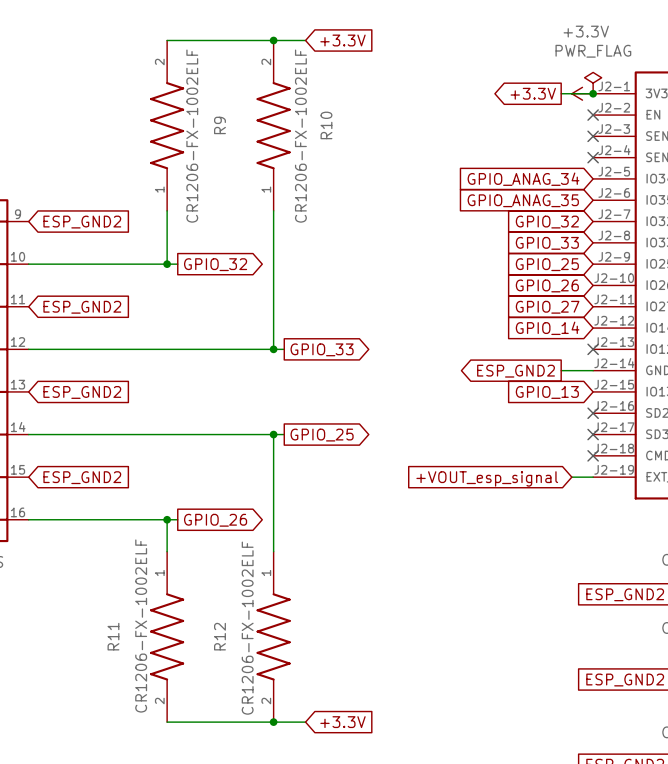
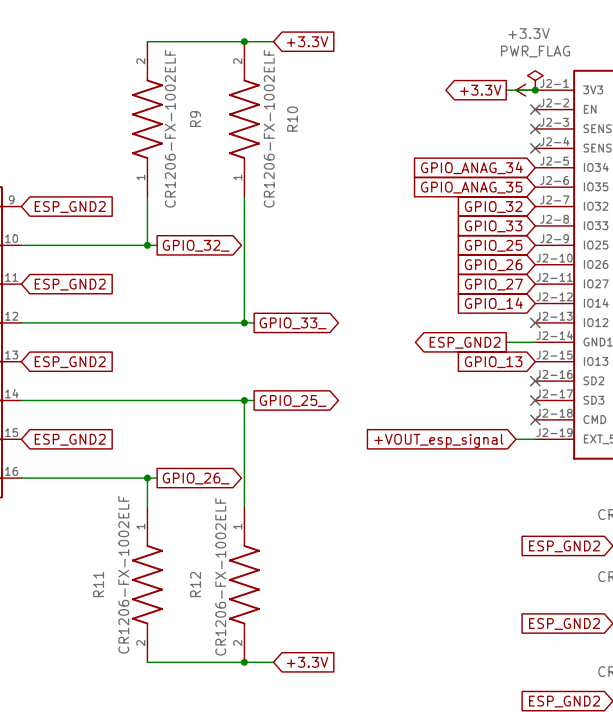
global label: GPIO_32 (215, 264) -> GPIO_32_ (196, 245)
global label: GPIO_33 (322, 349) -> GPIO_33_ (293, 323)
global label: GPIO_25 (322, 435) -> GPIO_25_ (293, 400)
global label: GPIO_26 (215, 520) -> GPIO_26_ (196, 478)

